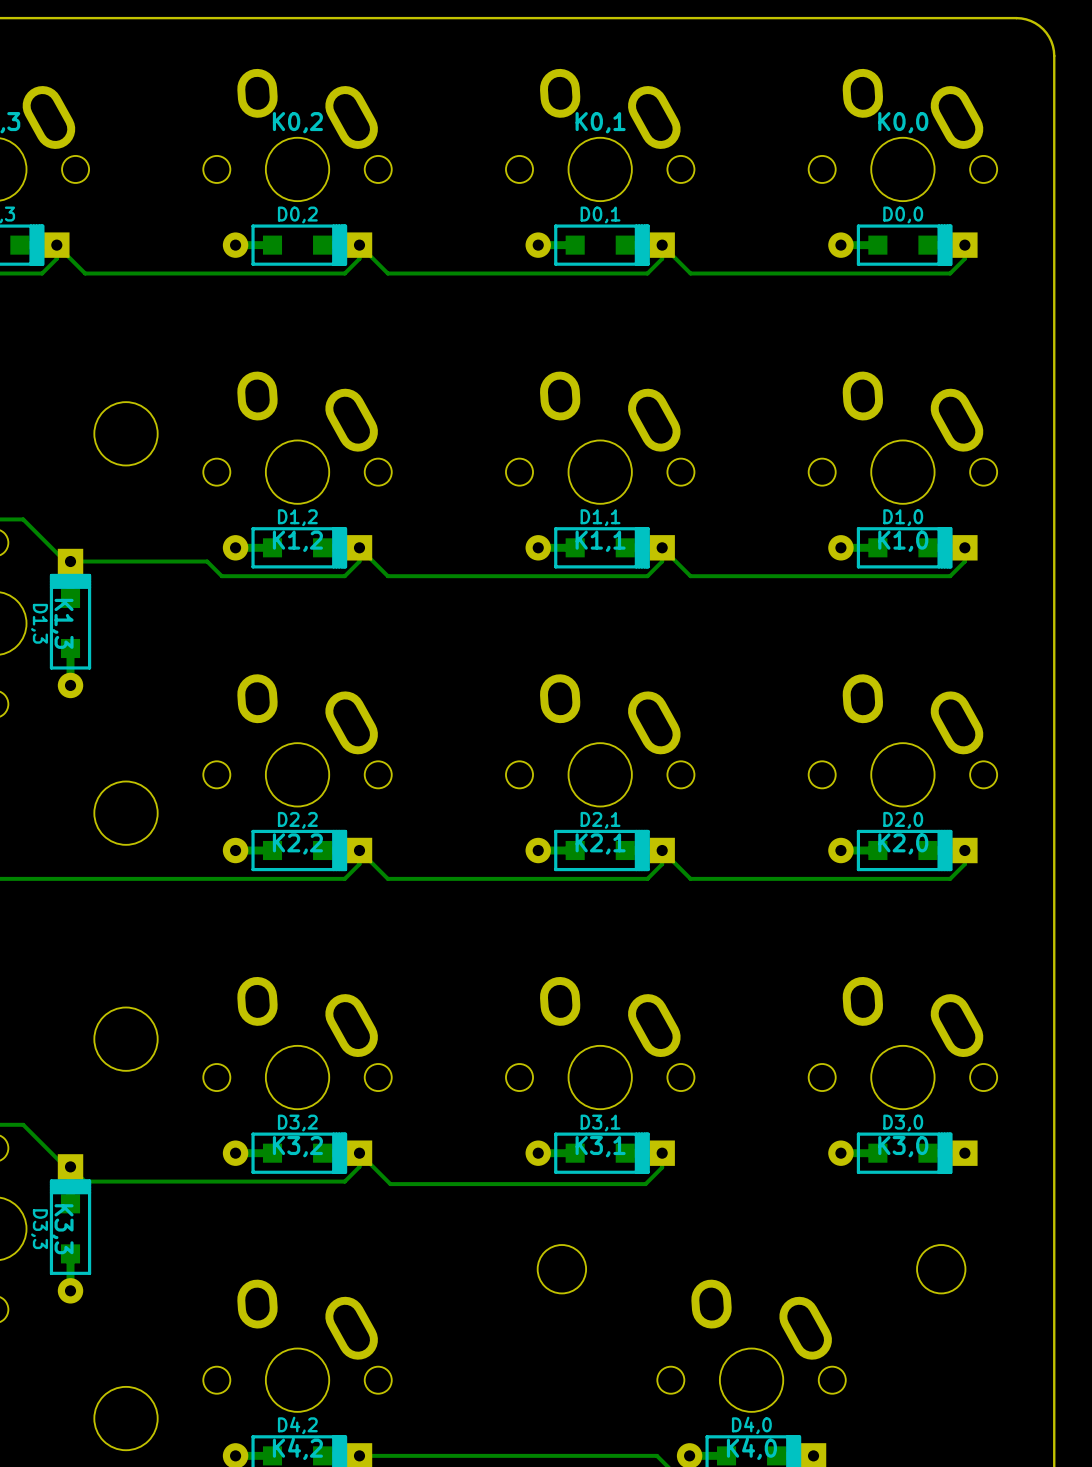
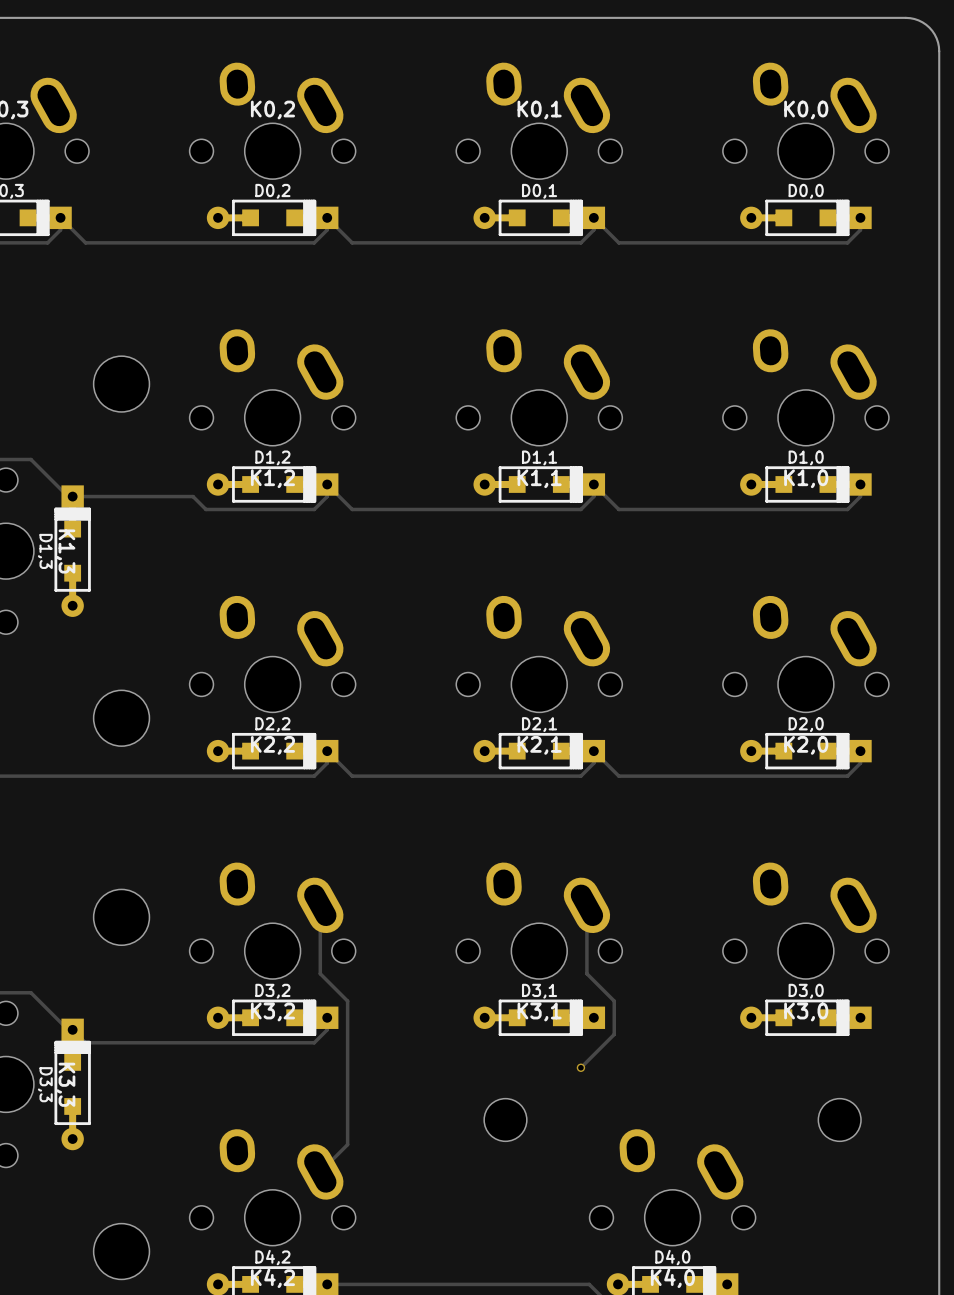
track: none -> (320, 905) (320, 973) (347, 1001) (347, 1144) (320, 1171)
track: none -> (586, 905) (586, 973) (614, 1001) (614, 1034) (580, 1067)
track: (662, 1153) (662, 1167) (645, 1184) (390, 1184) (359, 1153) -> none
via: none -> (580, 1067)

